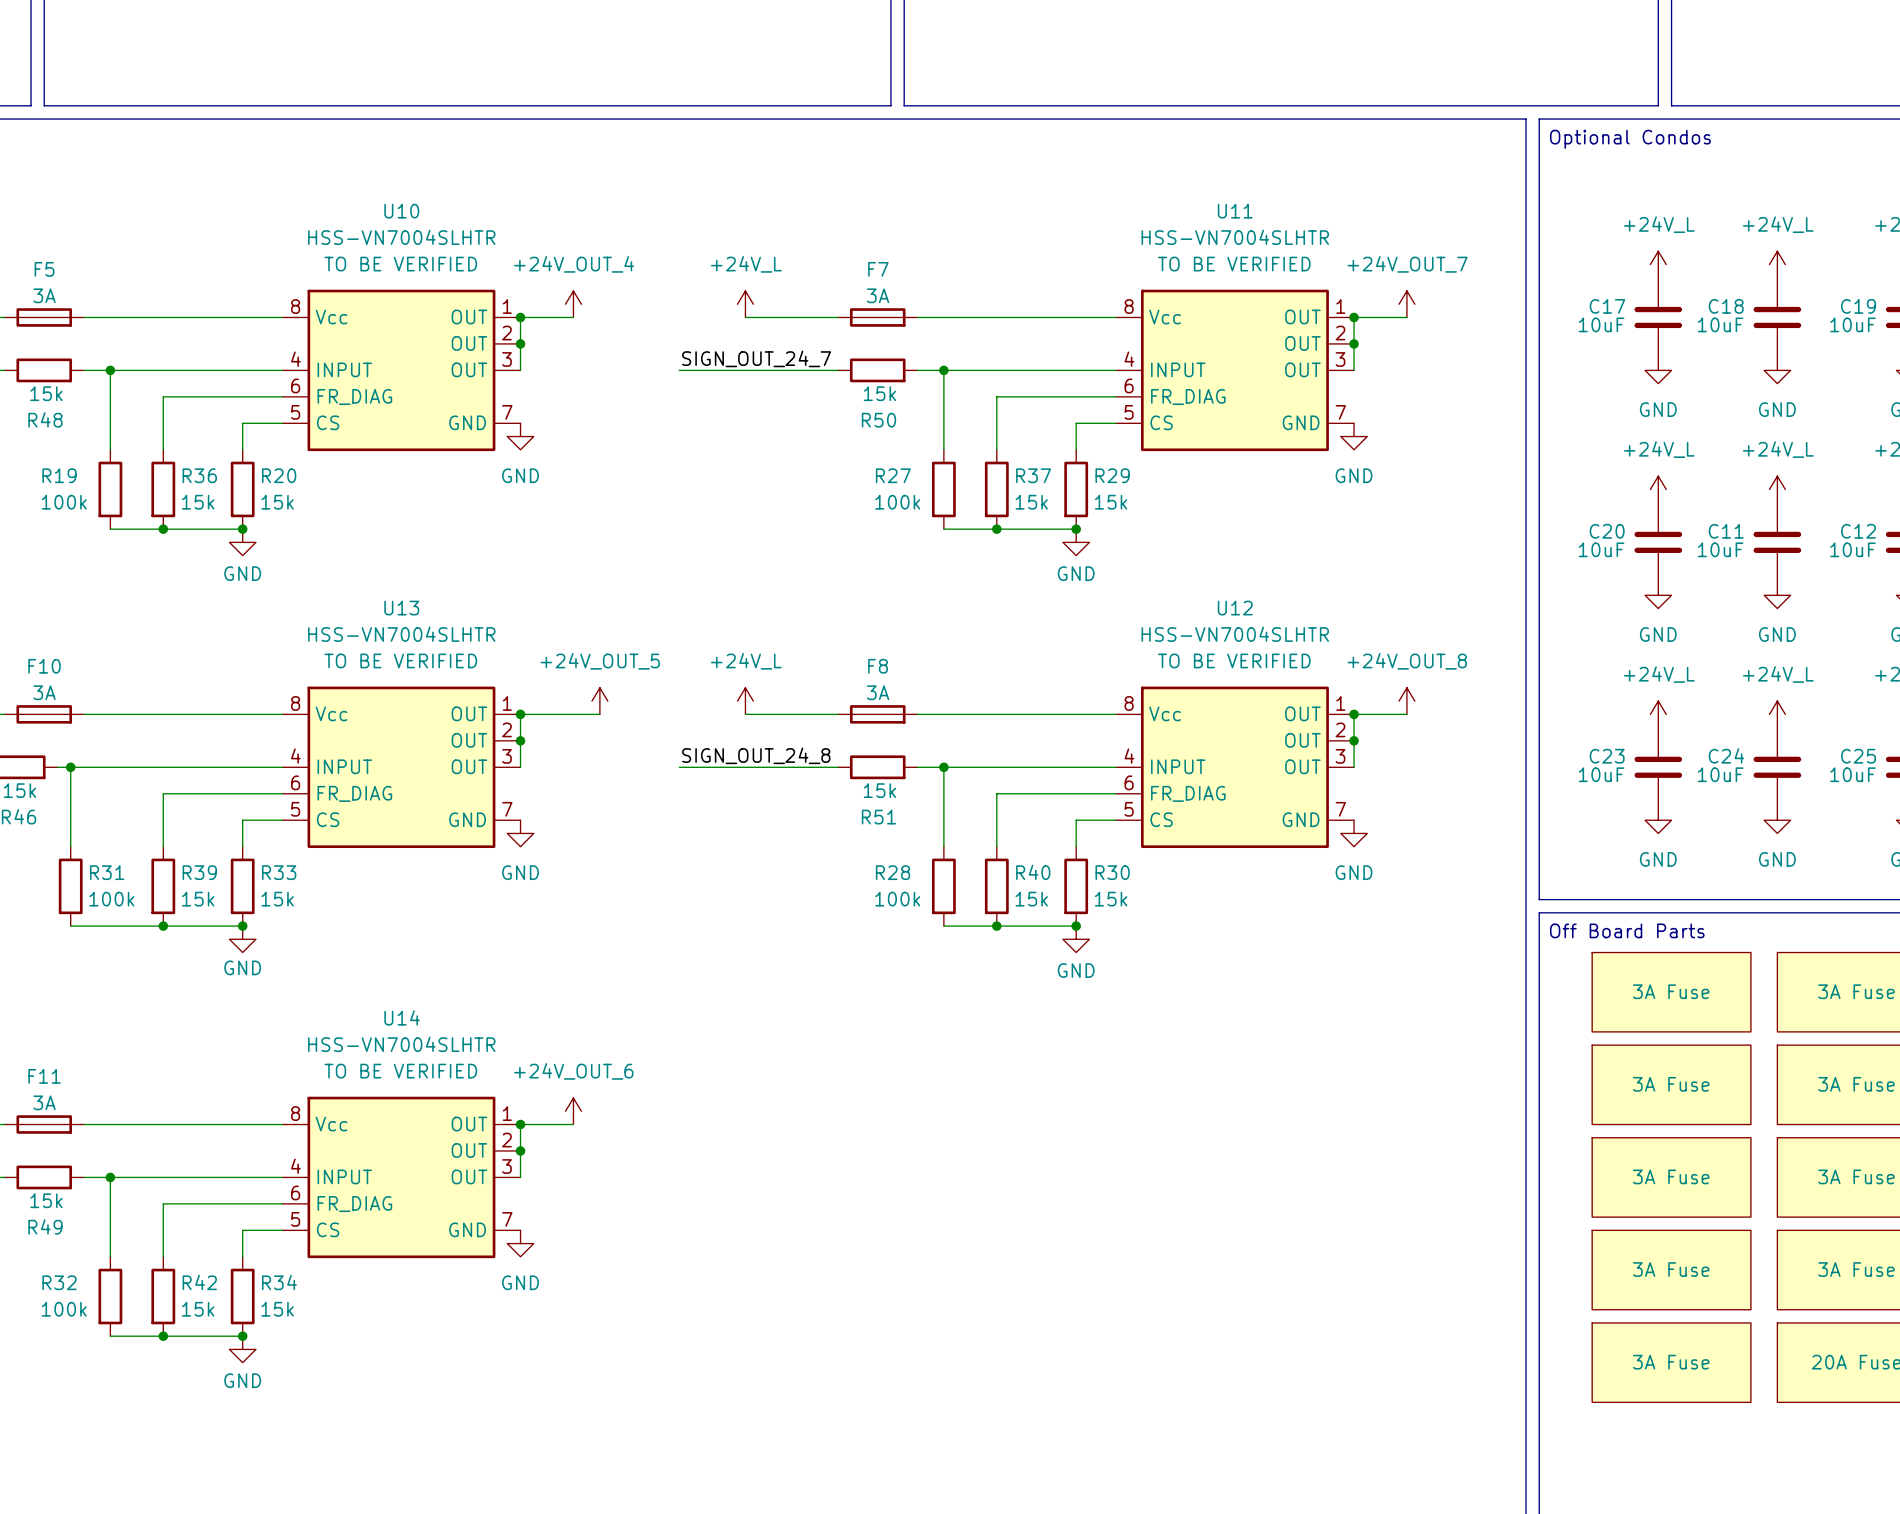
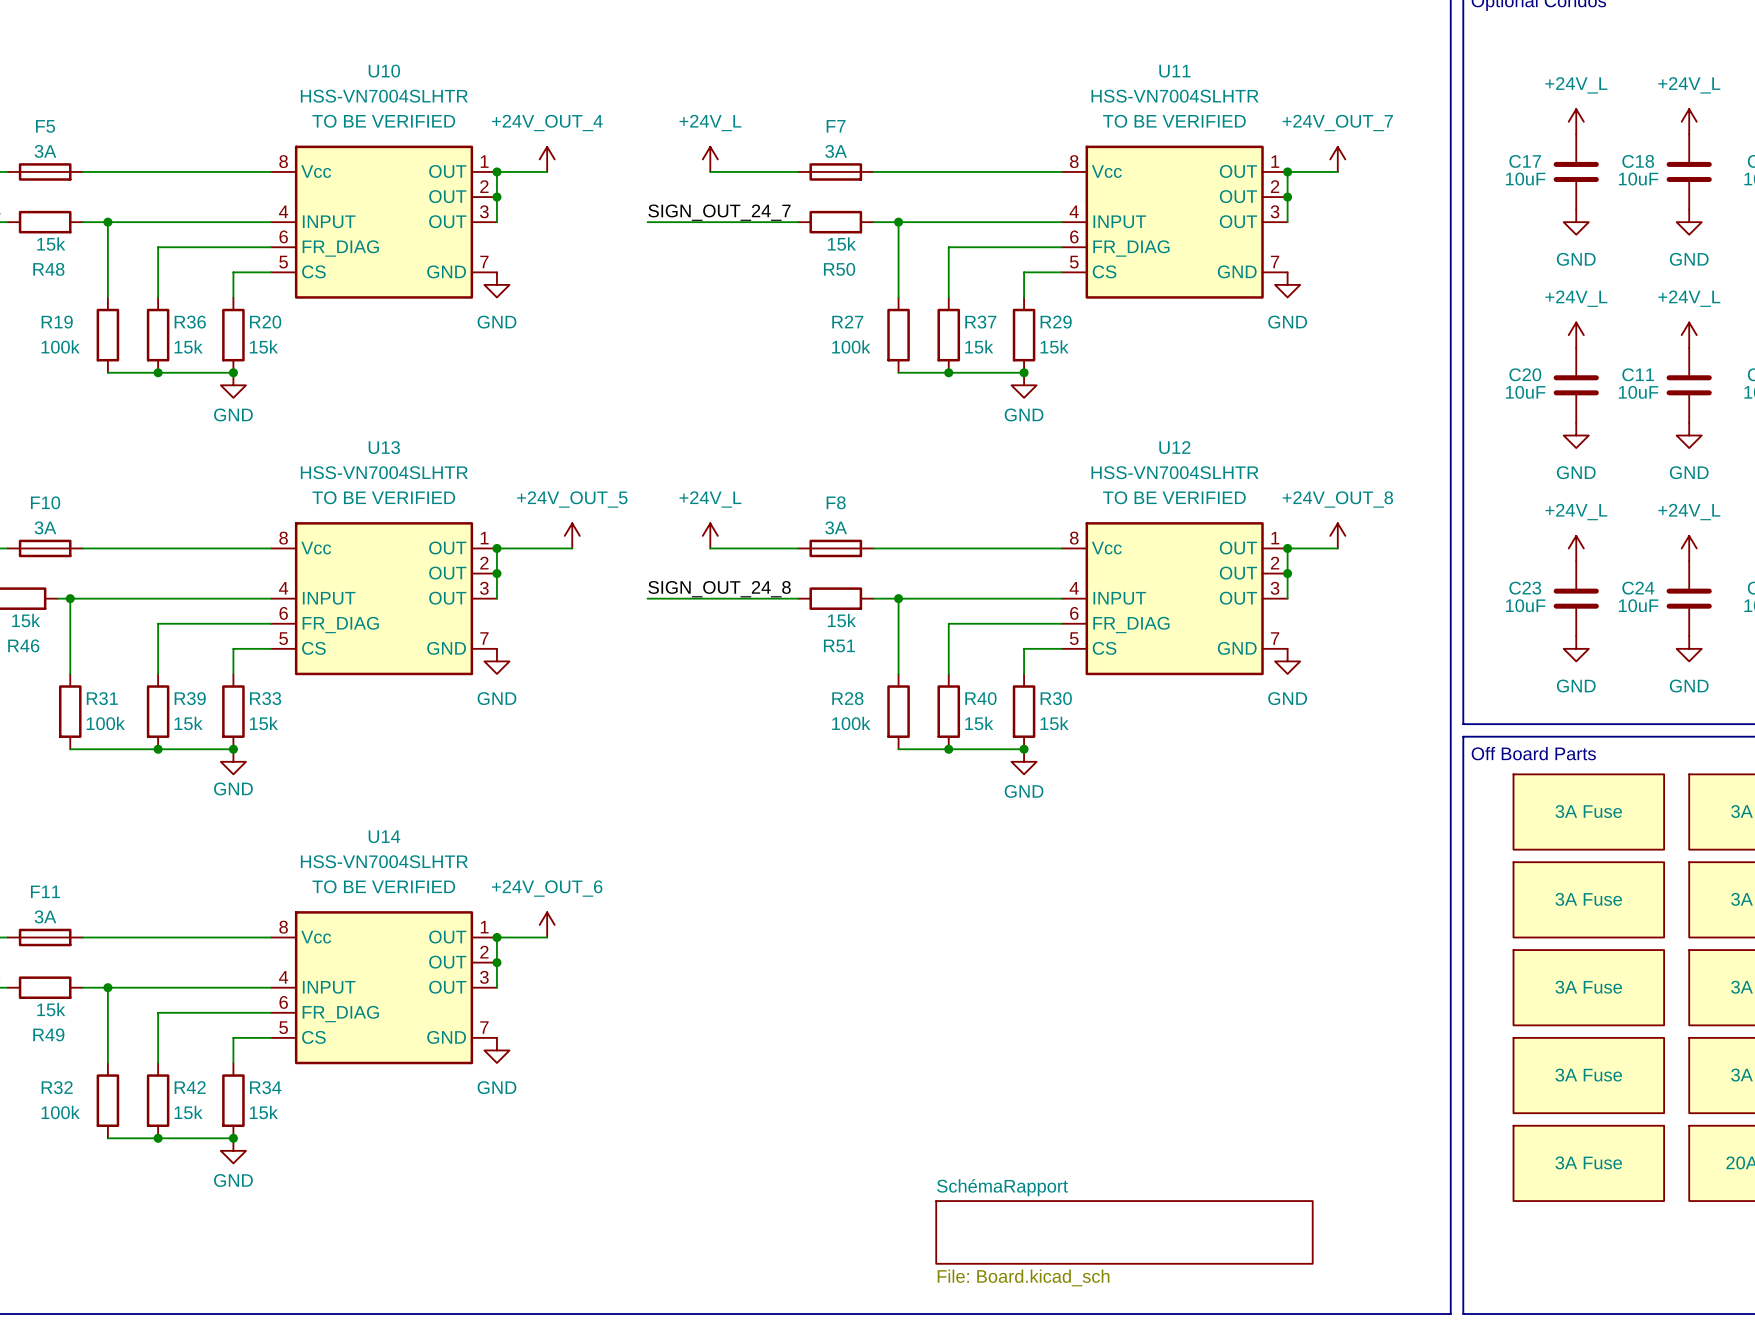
sheet SchémaRapport: none -> File: Board.kicad_sch (1124, 1232)

